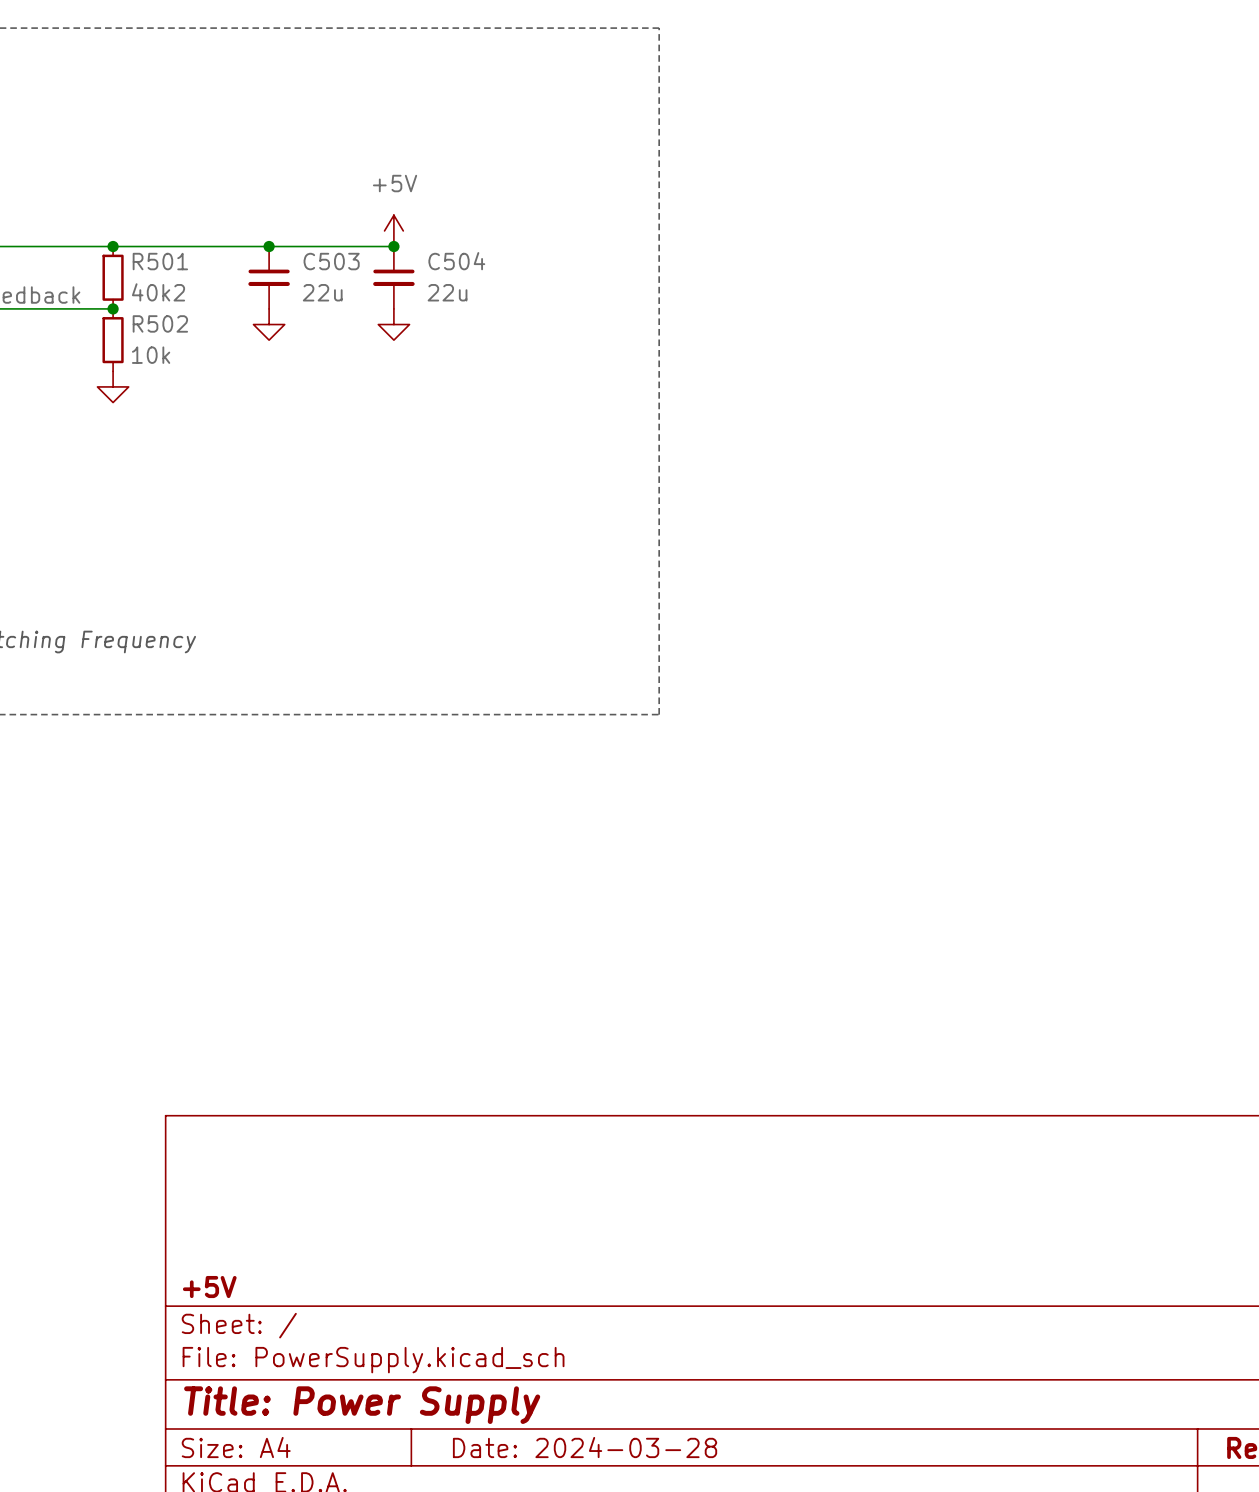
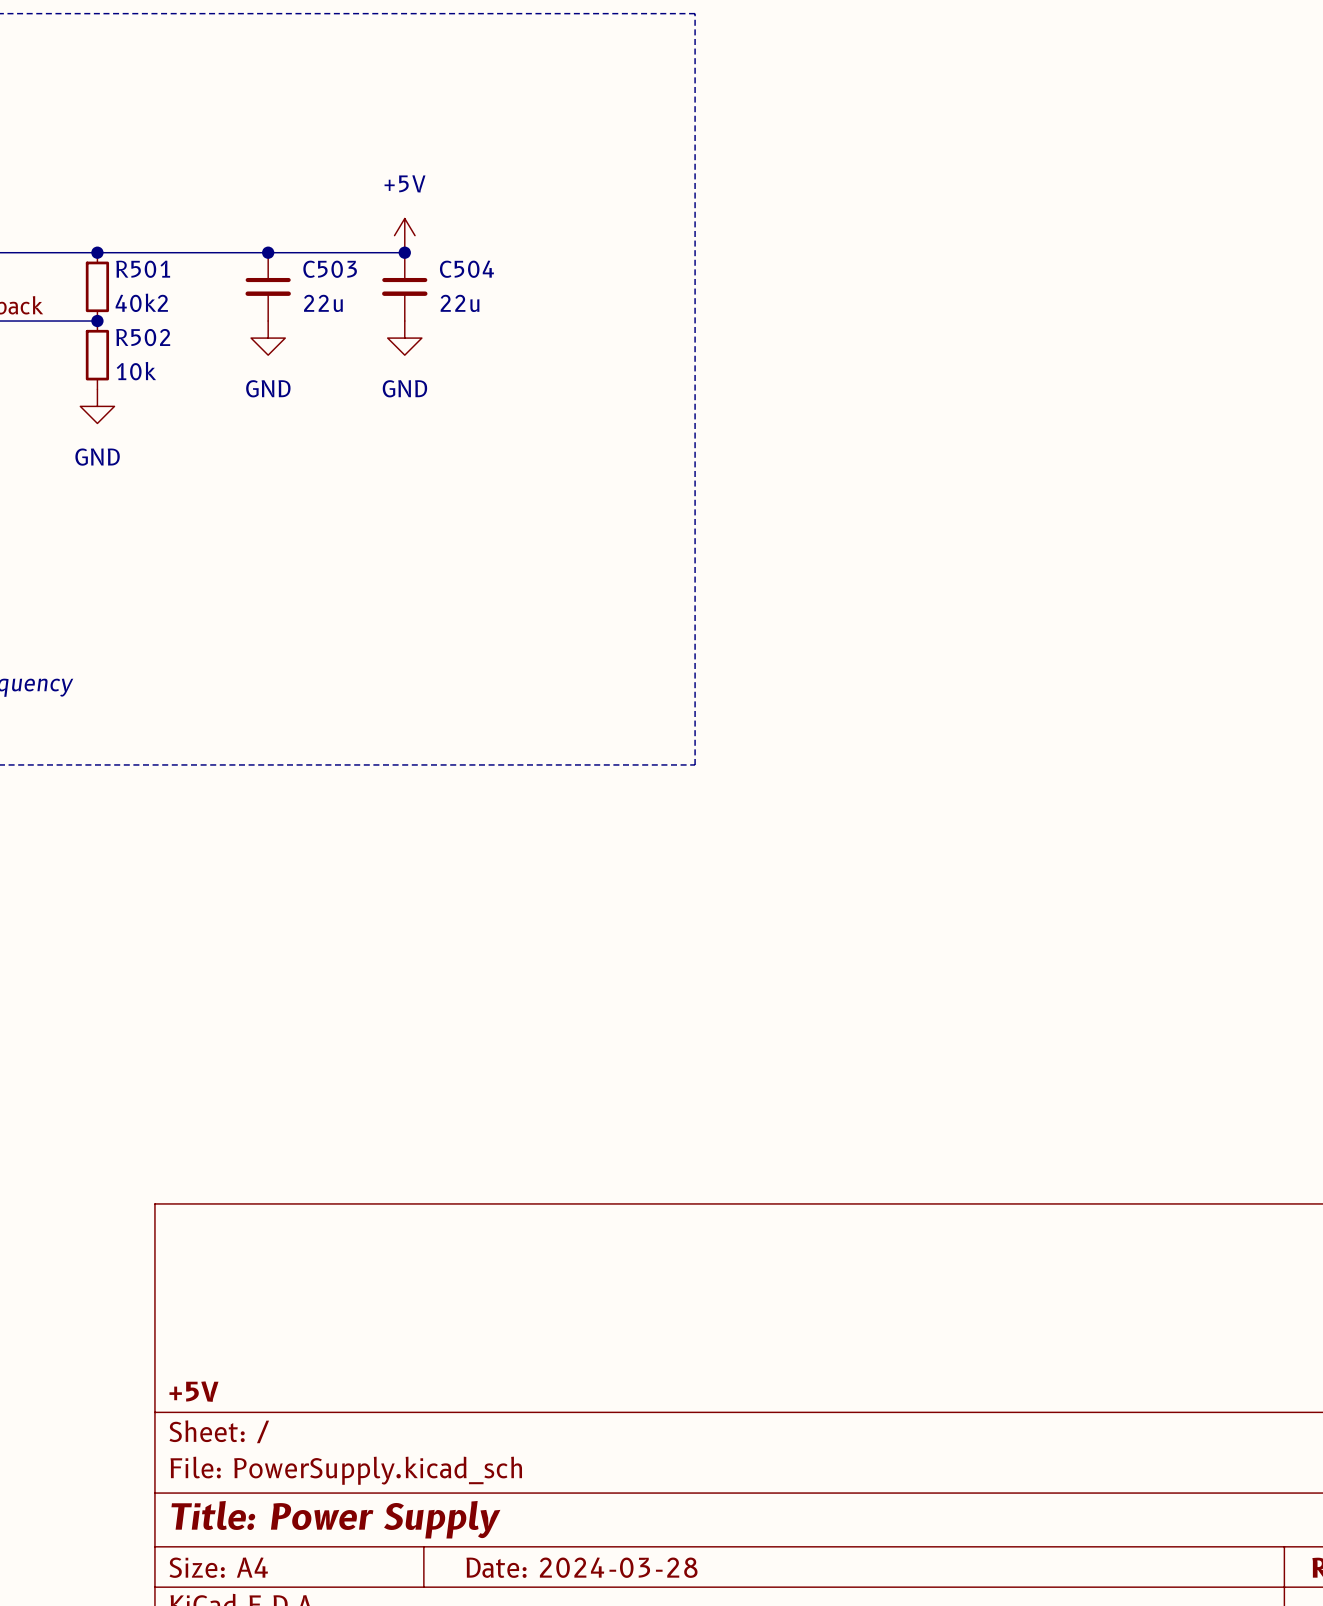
power symbol text: none -> GND (268, 388)
power symbol text: none -> GND (404, 388)
power symbol text: none -> GND (97, 457)

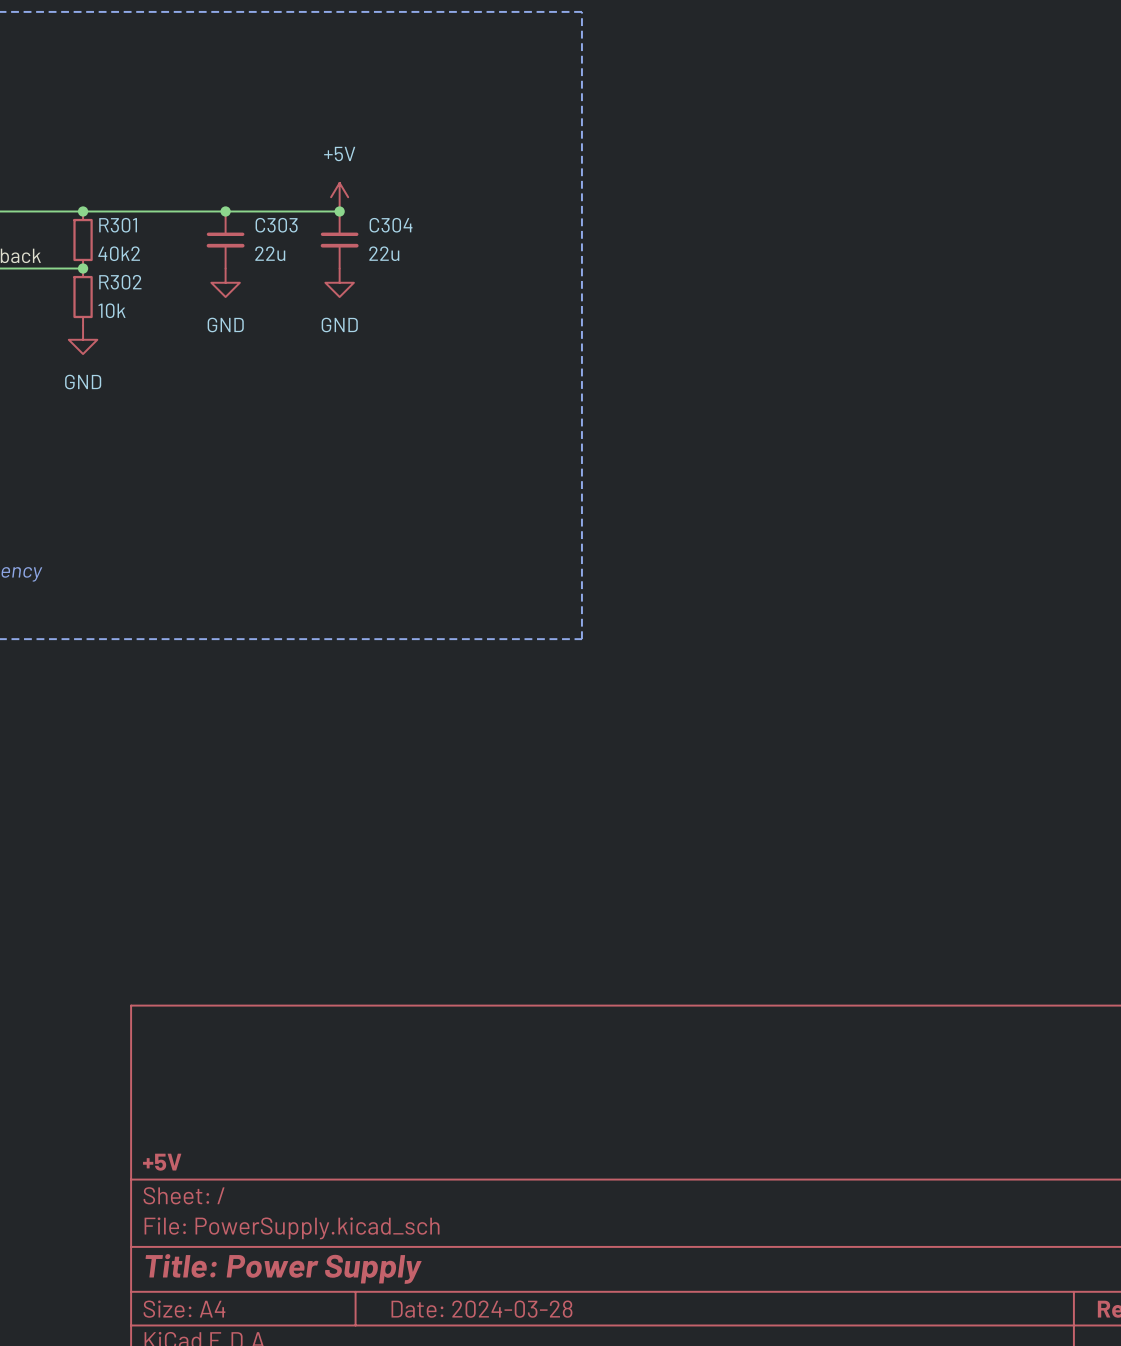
R501 name: R501 (143, 269) -> R301 (118, 225)
C503 name: C503 (330, 269) -> C303 (276, 225)
C504 name: C504 (466, 269) -> C304 (391, 225)
R502 name: R502 (143, 337) -> R302 (120, 282)

